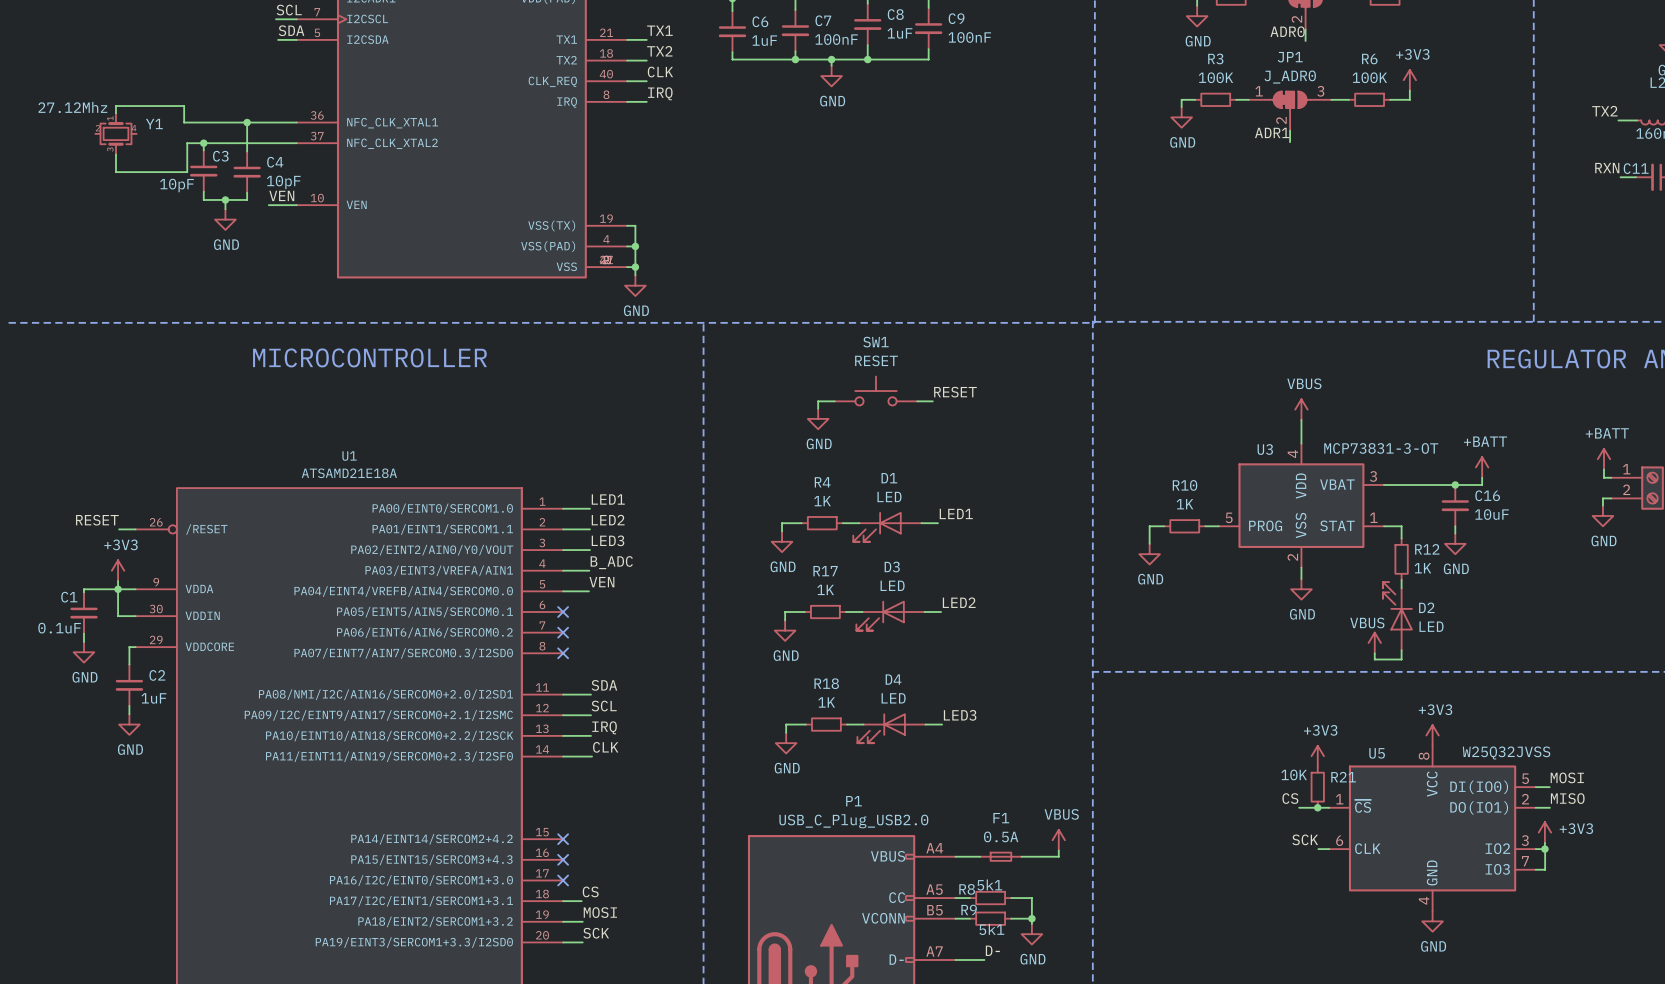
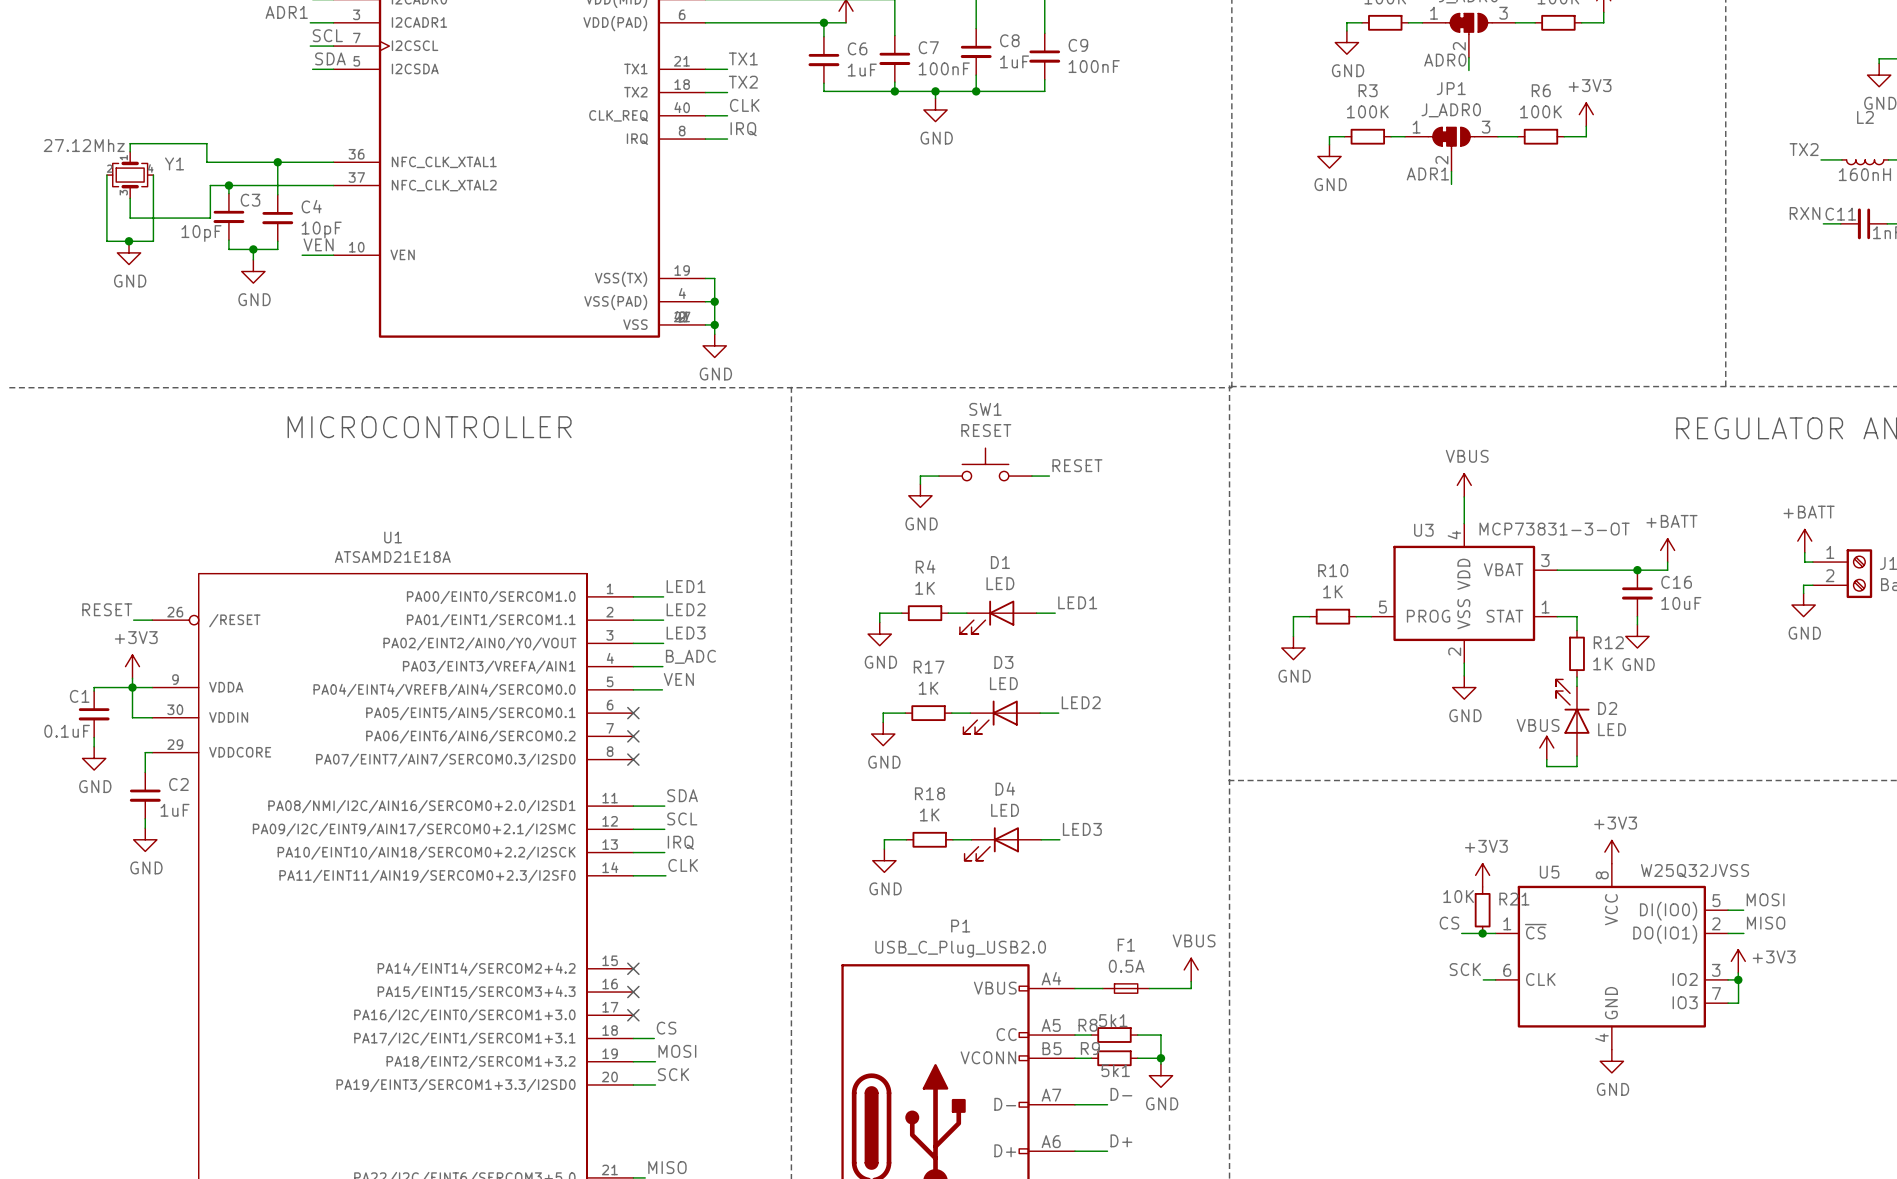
wire: none -> (106, 175) (106, 241) (153, 241) (153, 175)
junction: none -> (129, 241)
power symbol: none -> GND (129, 252)

